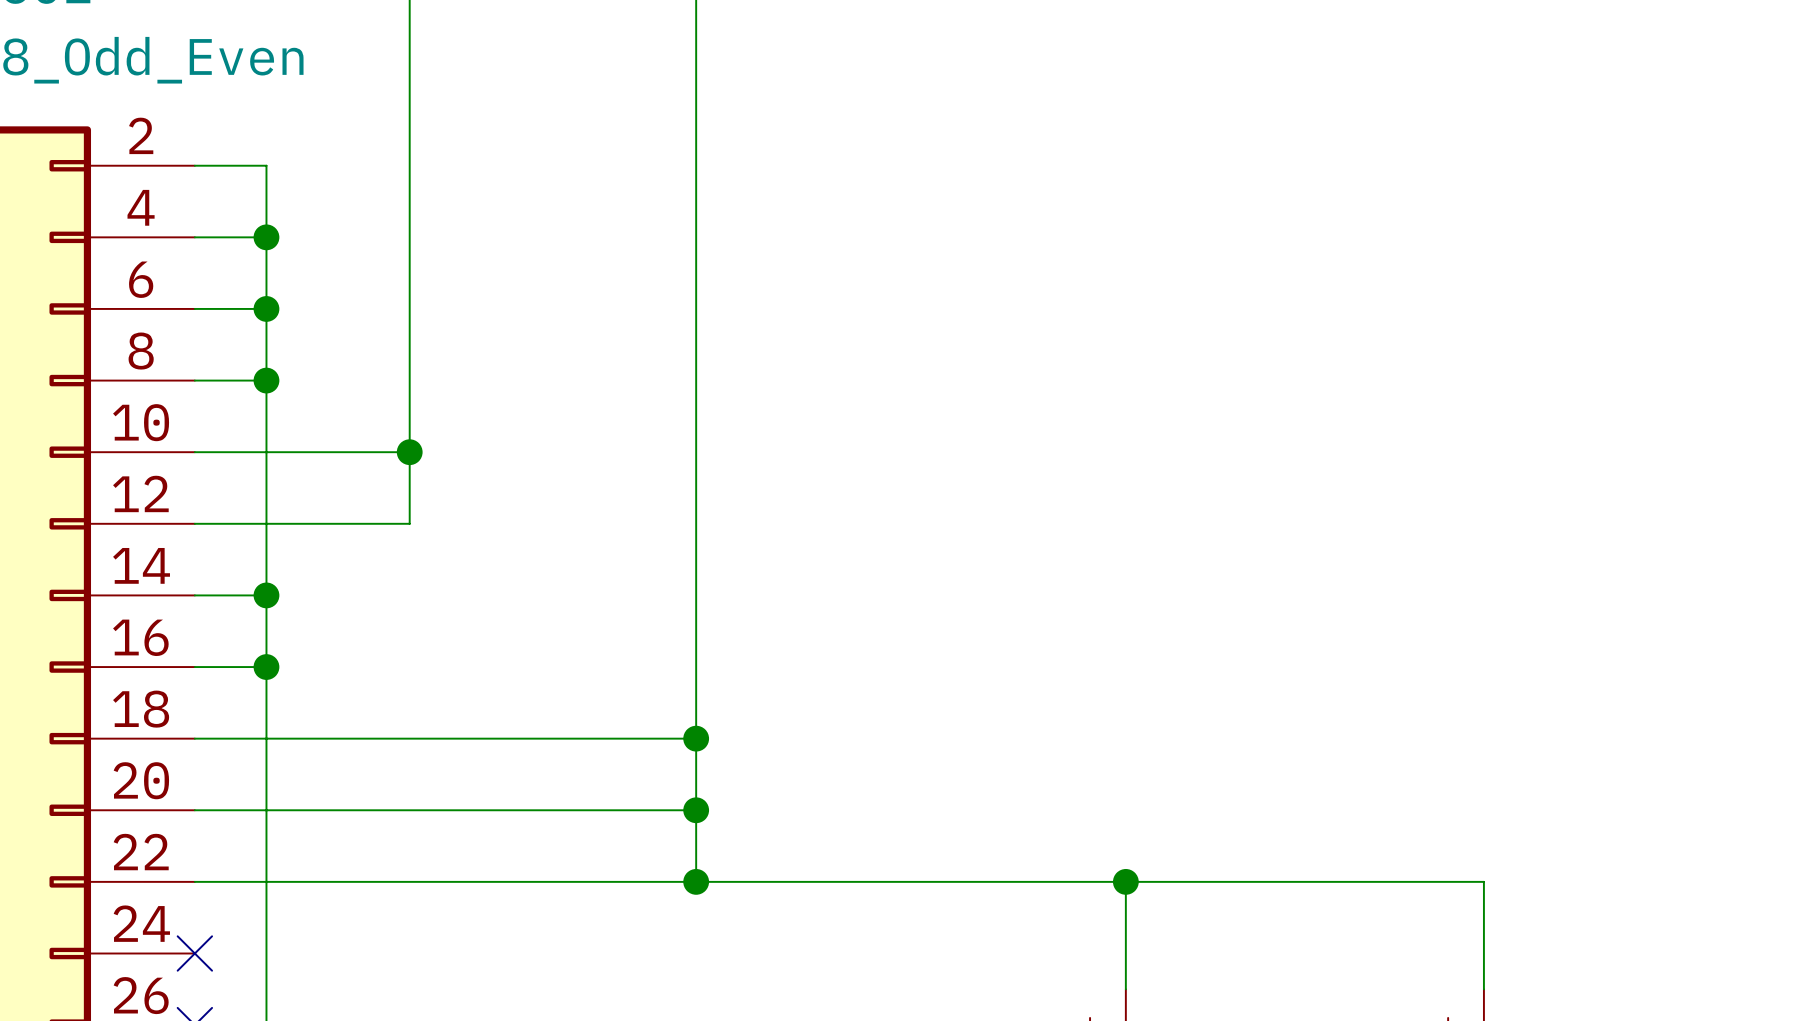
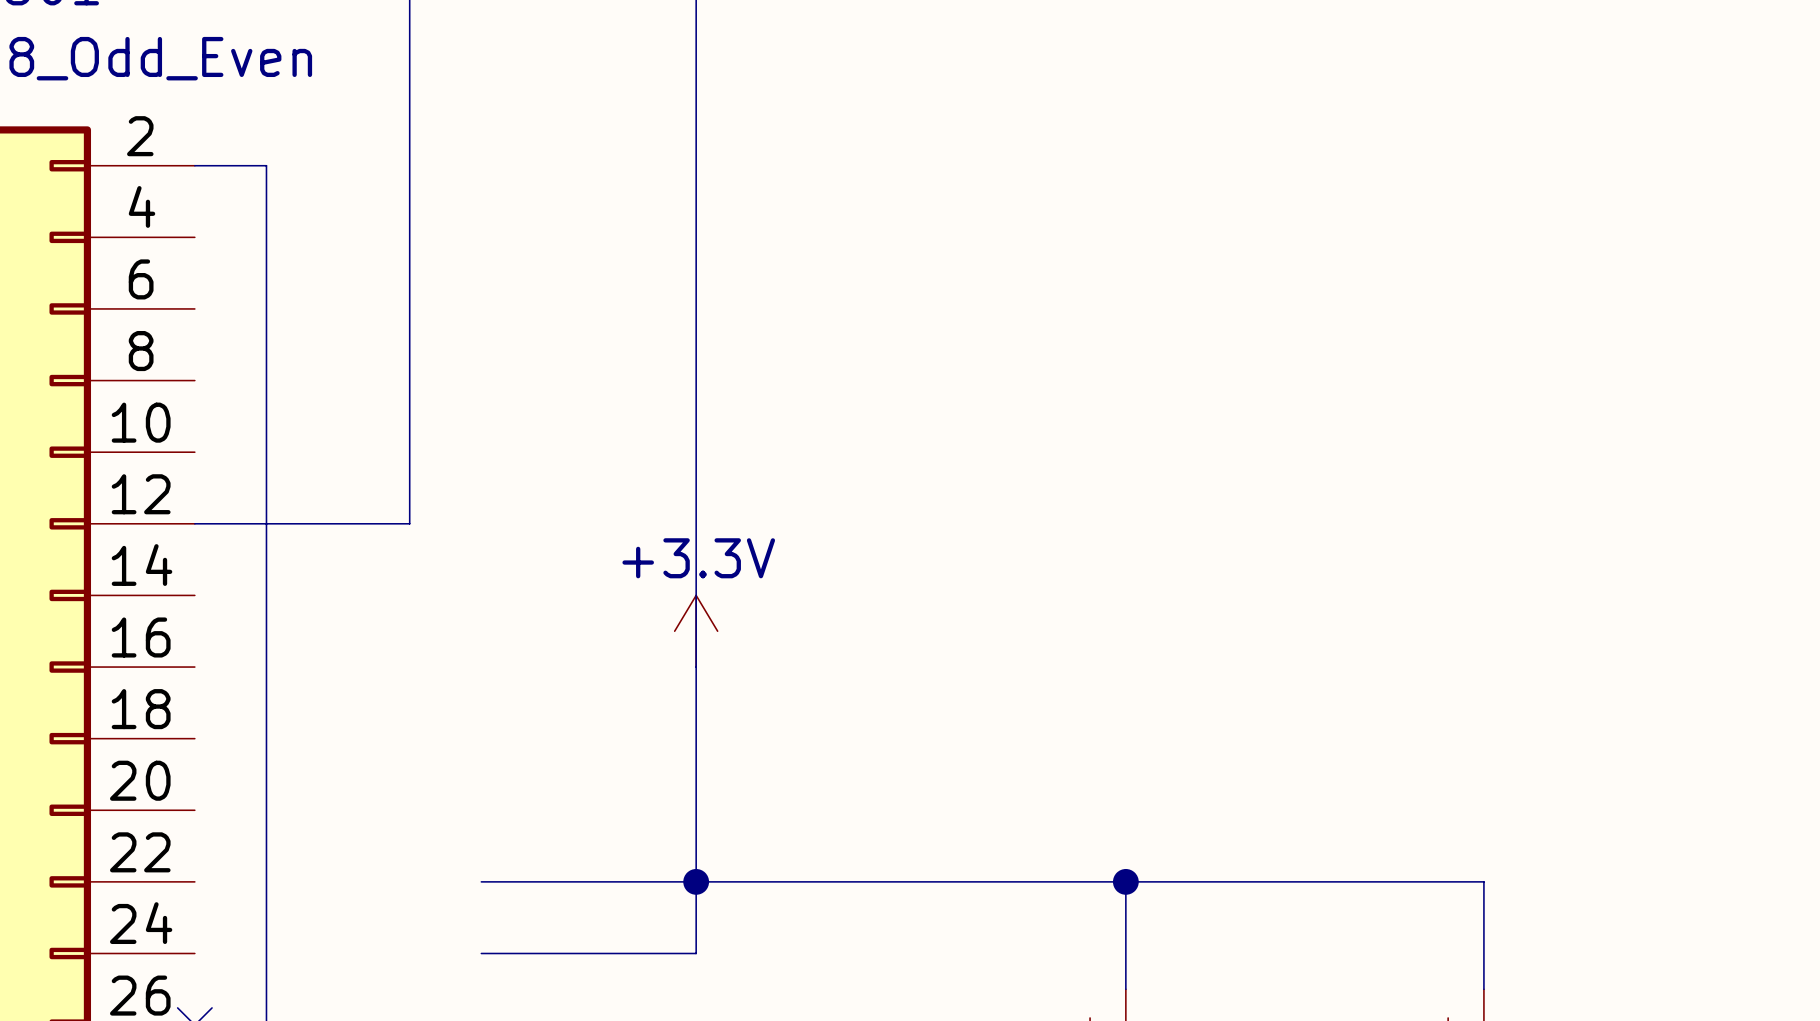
wire: (194, 237) (266, 237) -> none
junction: (266, 237) -> none
wire: (194, 308) (266, 308) -> none
junction: (266, 308) -> none
wire: (194, 380) (266, 380) -> none
junction: (266, 380) -> none
wire: (194, 452) (409, 452) -> none
junction: (409, 452) -> none
wire: (194, 595) (266, 595) -> none
junction: (266, 595) -> none
power symbol: none -> +3.3V (696, 631)
wire: (194, 667) (266, 667) -> none
junction: (266, 667) -> none
wire: (194, 738) (696, 738) -> none
junction: (696, 738) -> none
wire: (194, 810) (696, 810) -> none
junction: (696, 810) -> none
wire: (194, 881) (481, 881) -> none
wire: none -> (696, 881) (696, 953) (481, 953)
no-connect mark: (194, 953) -> none

